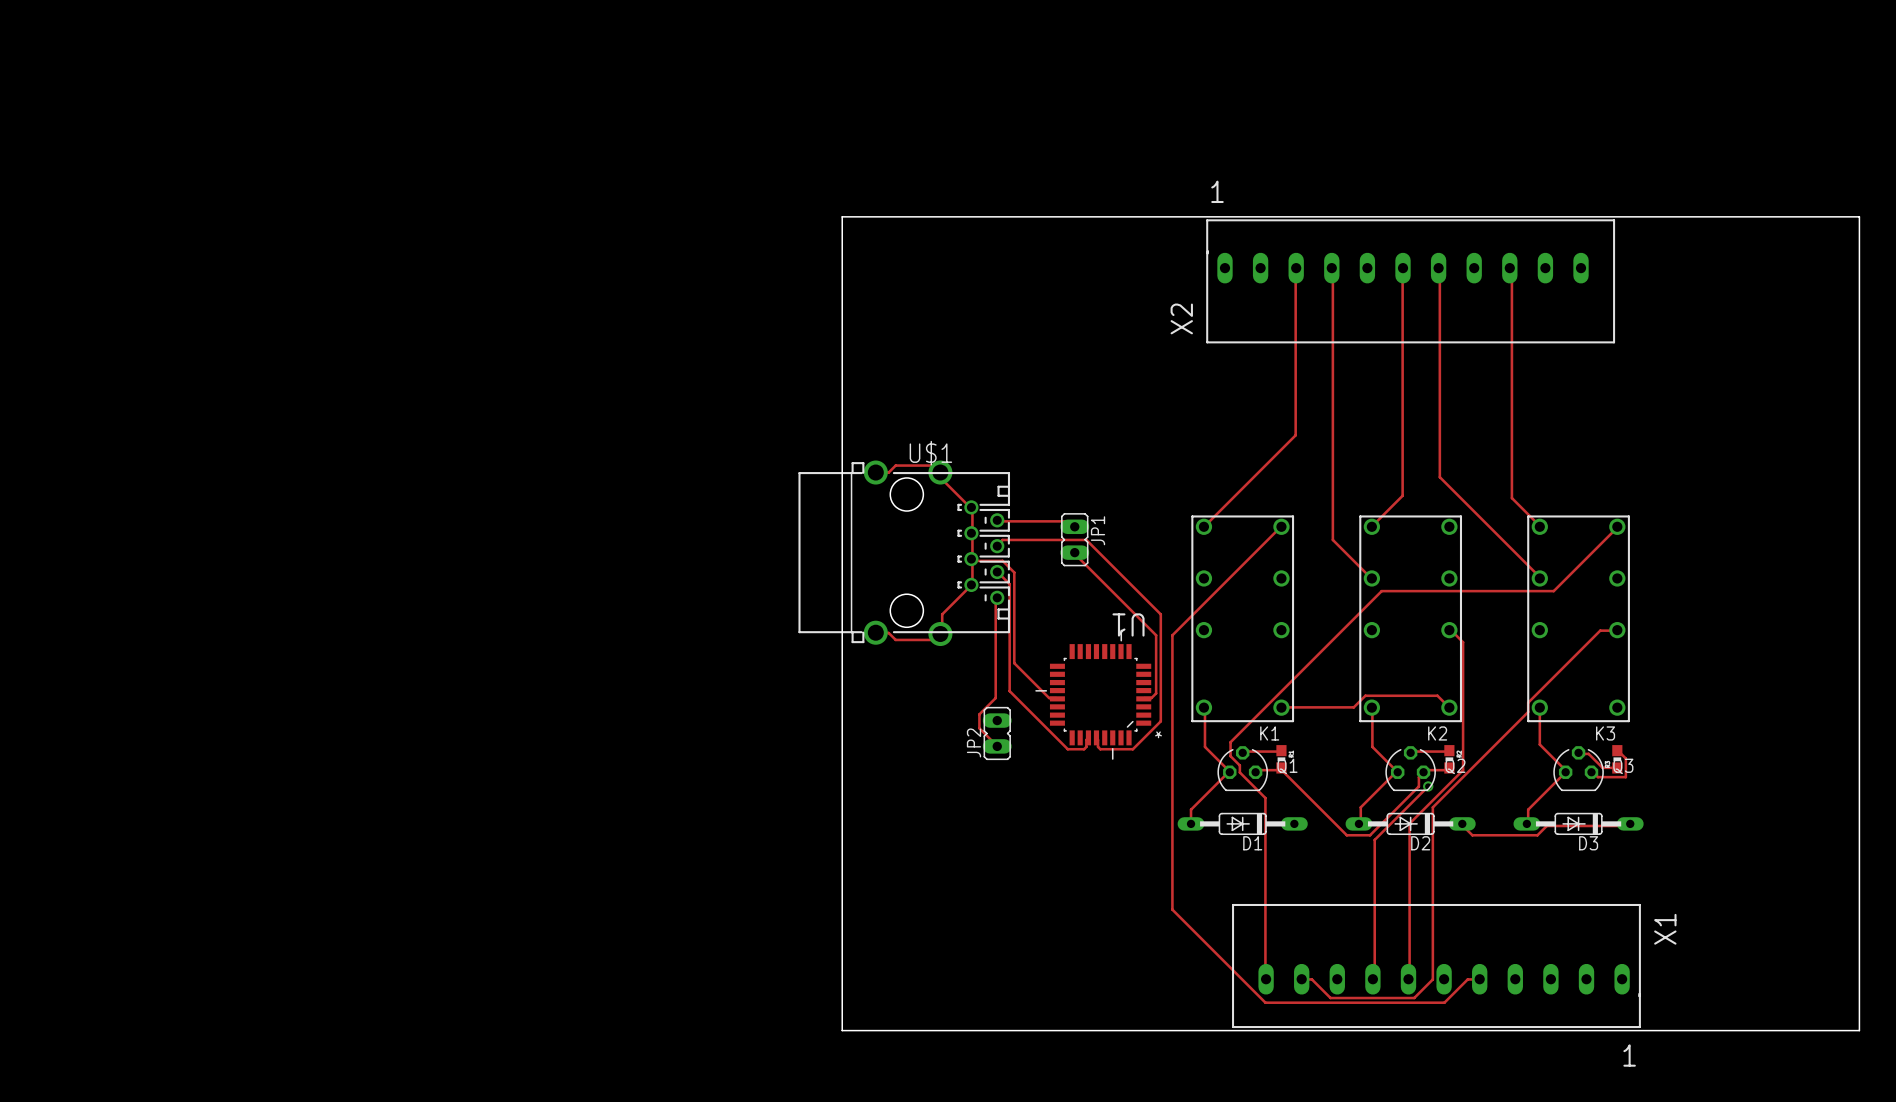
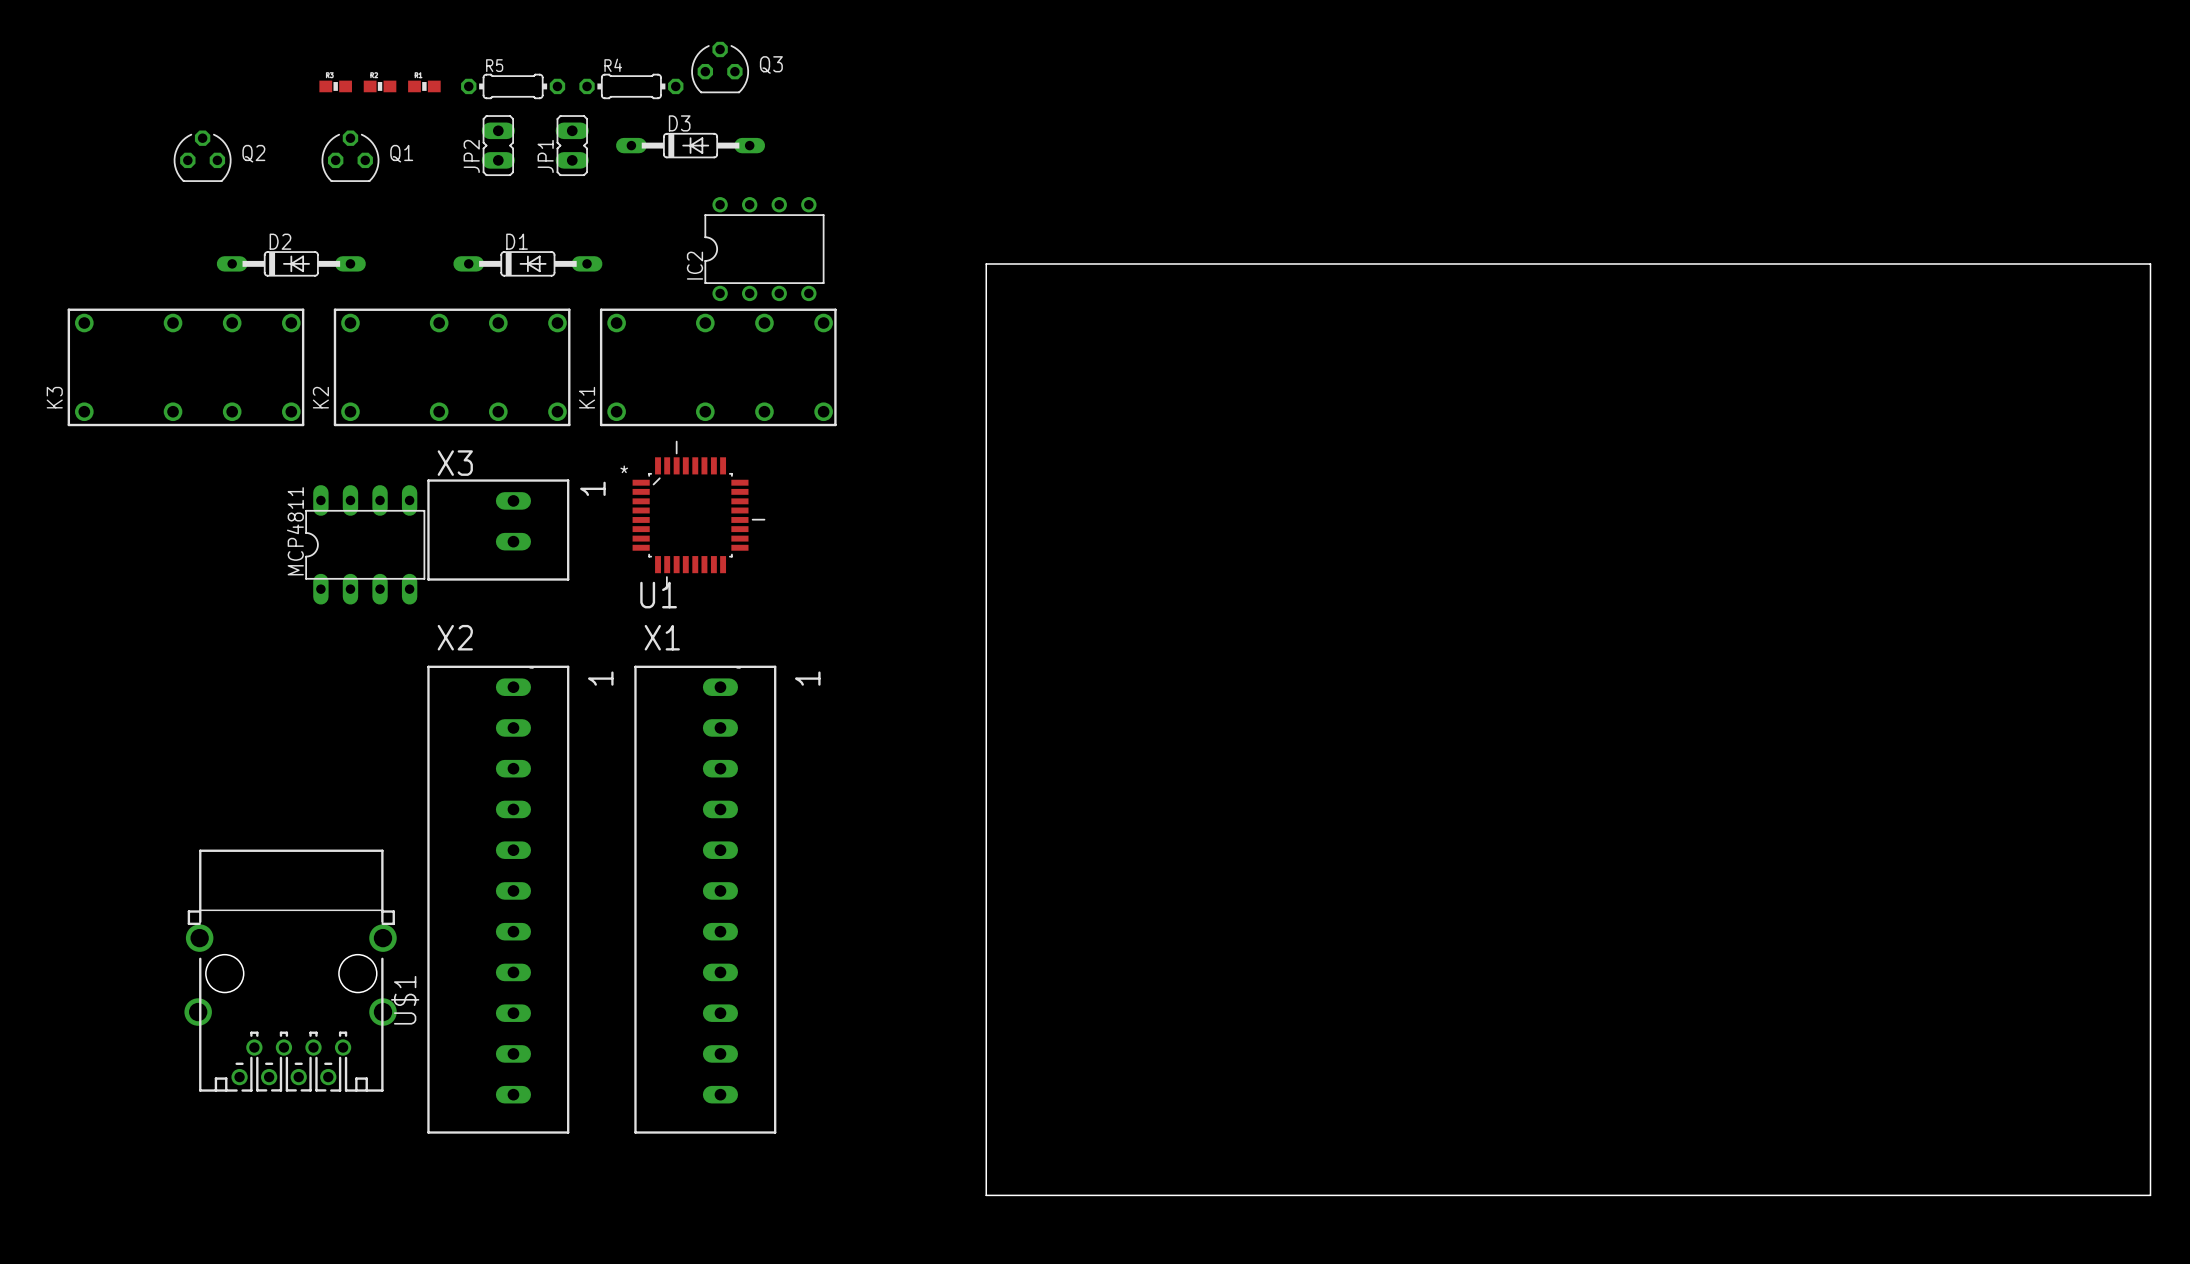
R5: none -> (513, 86)
R4: none -> (631, 86)
IC2: none -> (764, 249)
X2 footprint: [1206, 219, 1616, 344] -> [427, 665, 570, 1134]
track: (1296, 268) (1295, 435) (1203, 526) -> none
track: (1331, 268) (1332, 539) (1371, 578) -> none
track: (1403, 268) (1402, 495) (1371, 526) -> none
track: (1438, 268) (1439, 477) (1539, 578) -> none
track: (1509, 268) (1511, 270) (1511, 498) (1539, 526) -> none
X2 name position: X2 (1181, 318) -> X2 (455, 637)
X3: none -> (498, 530)
MCP4811: none -> (365, 544)
track: (875, 472) (888, 472) (895, 465) (932, 465) (942, 472) (942, 479) (970, 507) (972, 507) (972, 560) -> none
track: (997, 520) (1070, 521) (1074, 526) -> none
track: (1281, 526) (1172, 635) (1172, 909) (1265, 1002) (1444, 1002) (1467, 979) (1479, 979) -> none
track: (1617, 526) (1553, 591) (1381, 591) (1230, 742) (1230, 756) (1239, 765) (1239, 772) (1265, 798) (1266, 979) -> none
JP1 name position: JP1 (1098, 530) -> JP1 (545, 156)
JP1 position: (1074, 539) -> (572, 145)
track: (997, 546) (1002, 539) (1086, 539) (1160, 614) (1160, 721) (1132, 749) (1100, 749) (1096, 737) -> none
track: (1074, 552) (1156, 635) (1156, 693) (1151, 698) (1143, 698) -> none
U$1 rotation: 0° (904, 553) -> 90° clockwise (290, 970)
U$1 position: (904, 553) -> (290, 970)
track: (972, 560) (1002, 560) (1014, 572) (1014, 663) (1049, 698) (1057, 698) -> none
track: (972, 560) (972, 584) (942, 614) (942, 632) (935, 639) (895, 639) (888, 632) (875, 632) -> none
track: (997, 572) (1009, 584) (1009, 691) (1067, 749) (1084, 749) (1088, 737) -> none
track: (997, 597) (995, 598) (995, 698) (979, 714) (979, 728) (997, 746) -> none
K1 rotation: 0° (1242, 618) -> 90° clockwise (718, 367)
K1 position: (1242, 618) -> (718, 367)
K2 rotation: 0° (1410, 618) -> 90° clockwise (452, 367)
K2 position: (1410, 618) -> (452, 367)
K3 rotation: 0° (1578, 618) -> 90° clockwise (185, 367)
K3 position: (1578, 618) -> (185, 367)
track: (1449, 630) (1463, 642) (1463, 770) (1409, 823) (1408, 979) -> none
track: (1617, 630) (1600, 630) (1528, 702) (1528, 712) (1432, 807) (1432, 979) (1414, 998) (1330, 998) (1311, 979) (1301, 979) -> none
U1 rotation: 0° (1093, 694) -> 180° (698, 515)
U1 position: (1093, 694) -> (698, 515)
track: (1203, 707) (1204, 746) (1229, 772) (1191, 809) (1191, 823) -> none
track: (1281, 707) (1353, 707) (1365, 695) (1437, 695) (1449, 707) -> none
track: (1371, 707) (1372, 746) (1397, 772) (1360, 807) (1360, 823) (1358, 823) -> none
track: (1539, 707) (1539, 744) (1565, 772) (1528, 809) (1526, 823) -> none
JP2 position: (997, 733) -> (498, 145)
track: (1281, 750) (1242, 752) -> none
track: (1449, 750) (1410, 752) -> none
track: (1617, 750) (1625, 758) (1625, 777) (1597, 777) (1591, 772) -> none
track: (1578, 752) (1588, 753) (1602, 767) (1617, 767) -> none
part rotation: 0° (1281, 759) -> 90° clockwise (424, 86)
part position: (1281, 759) -> (424, 86)
part rotation: 0° (1449, 759) -> 90° clockwise (380, 86)
part position: (1449, 759) -> (380, 86)
part rotation: 0° (1617, 759) -> 90° clockwise (335, 86)
part position: (1617, 759) -> (335, 86)
track: (1449, 767) (1449, 770) (1423, 770) (1418, 777) (1418, 786) (1370, 835) (1346, 835) (1281, 767) (1279, 770) (1256, 770) (1255, 772) -> none
Q1 position: (1242, 768) -> (350, 156)
Q2 position: (1410, 768) -> (202, 156)
Q3 position: (1578, 768) -> (720, 67)
track: (1428, 786) (1374, 839) (1374, 977) (1372, 979) -> none
via: (1428, 786) -> none
D1 rotation: 0° (1242, 823) -> 180° (527, 263)
D1 position: (1242, 823) -> (527, 263)
D2 rotation: 0° (1410, 823) -> 180° (291, 263)
D2 position: (1410, 823) -> (291, 263)
track: (1462, 823) (1472, 835) (1537, 835) (1546, 825) (1628, 825) (1630, 823) -> none
D3 rotation: 0° (1578, 823) -> 180° (690, 145)
D3 position: (1578, 823) -> (690, 145)
X1 rotation: 0° (1436, 966) -> 90° counterclockwise (705, 899)
X1 position: (1436, 966) -> (705, 899)

